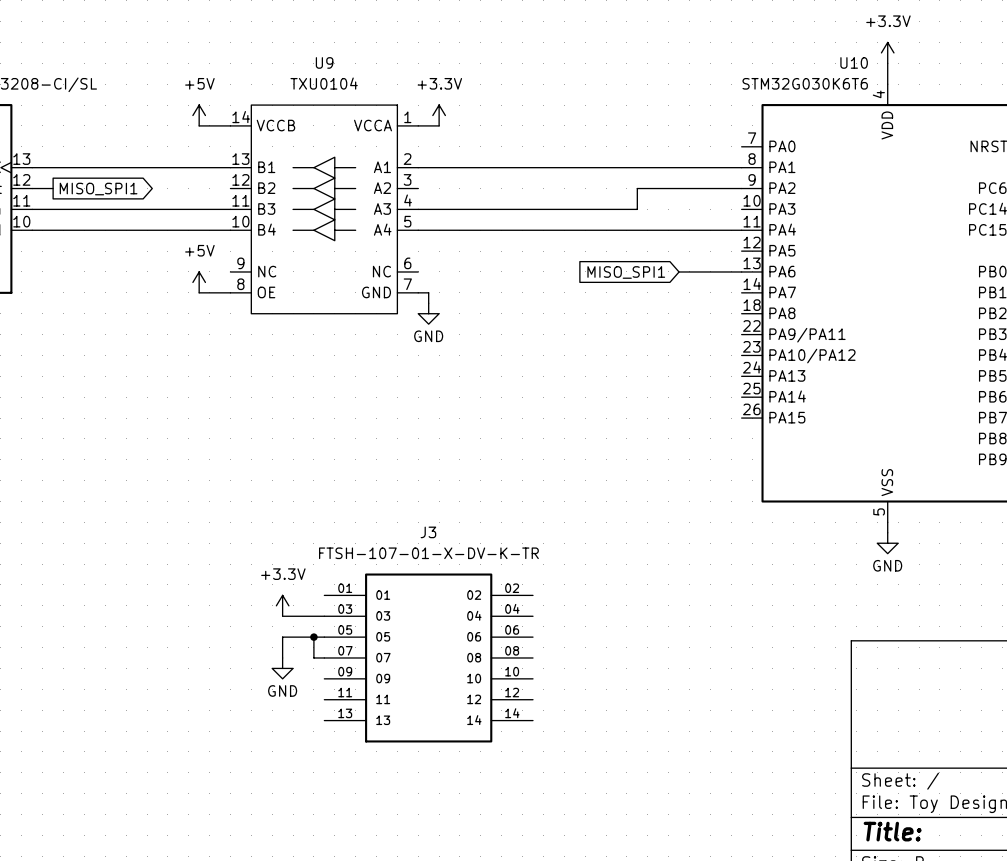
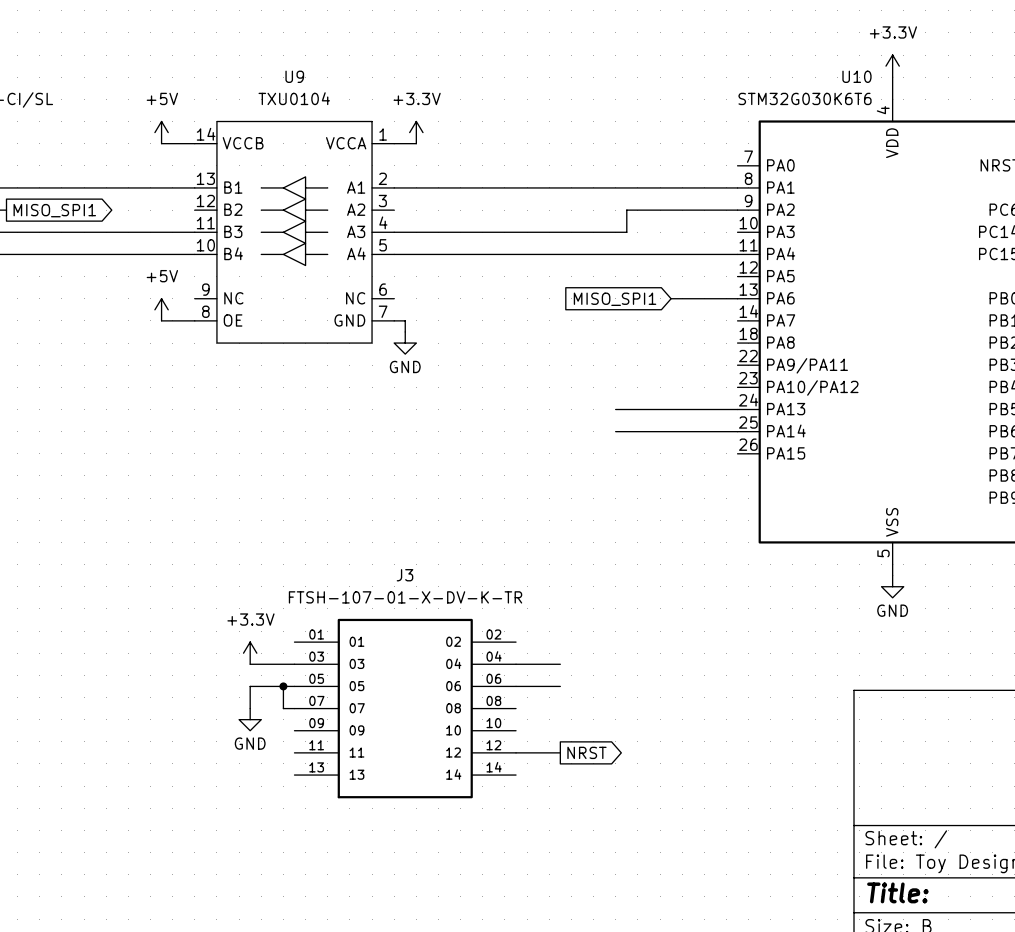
wire: none -> (615, 409) (737, 409)
wire: none -> (615, 431) (737, 431)
wire: none -> (516, 664) (560, 664)
wire: none -> (516, 686) (560, 686)
wire: none -> (516, 752) (560, 752)
global label: none -> NRST (586, 752)

